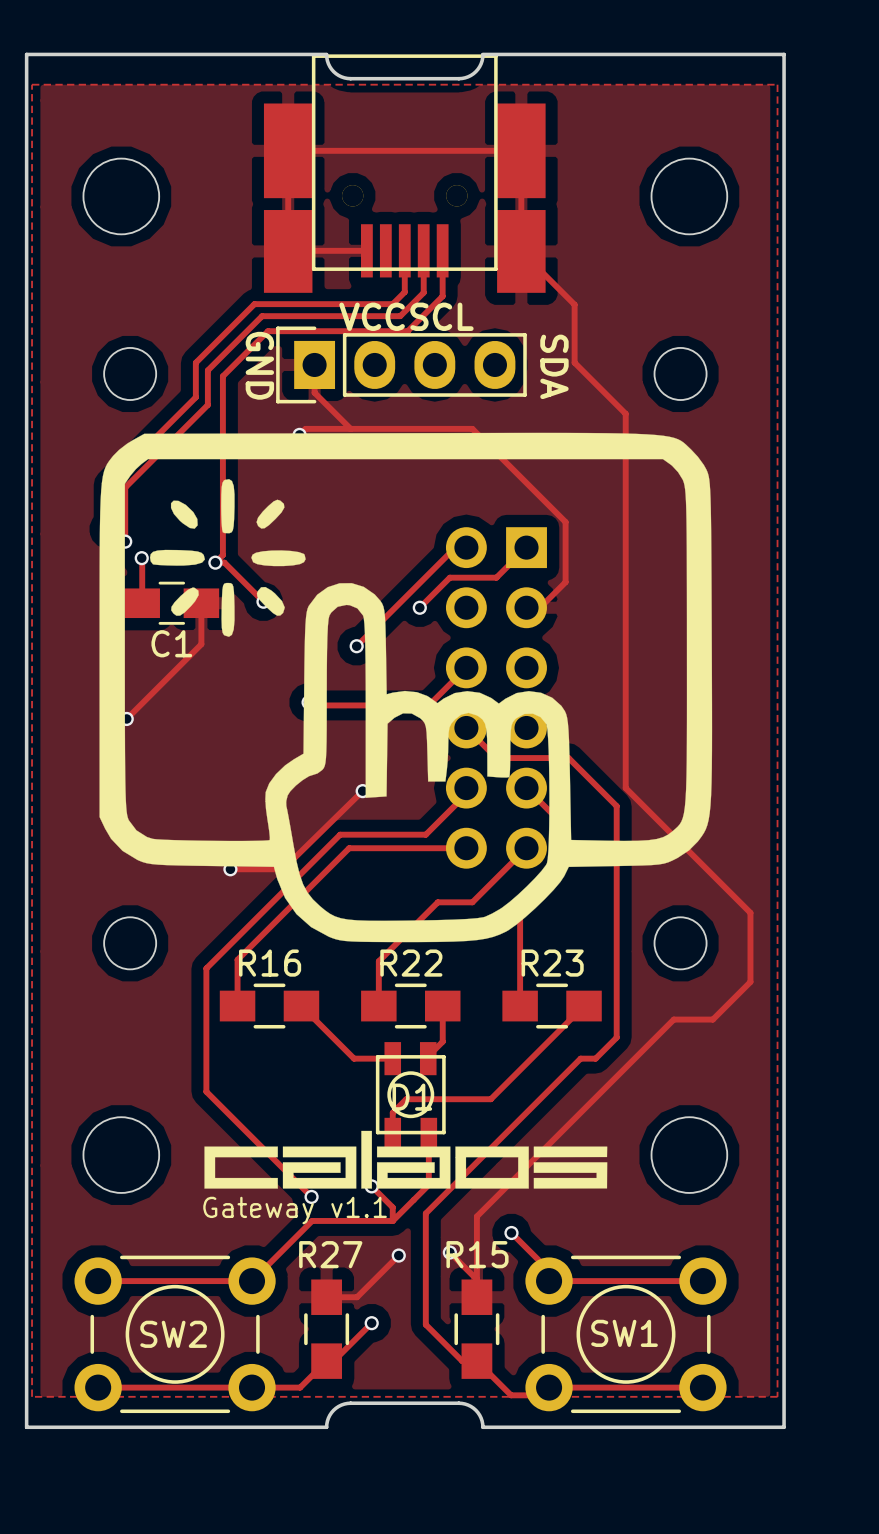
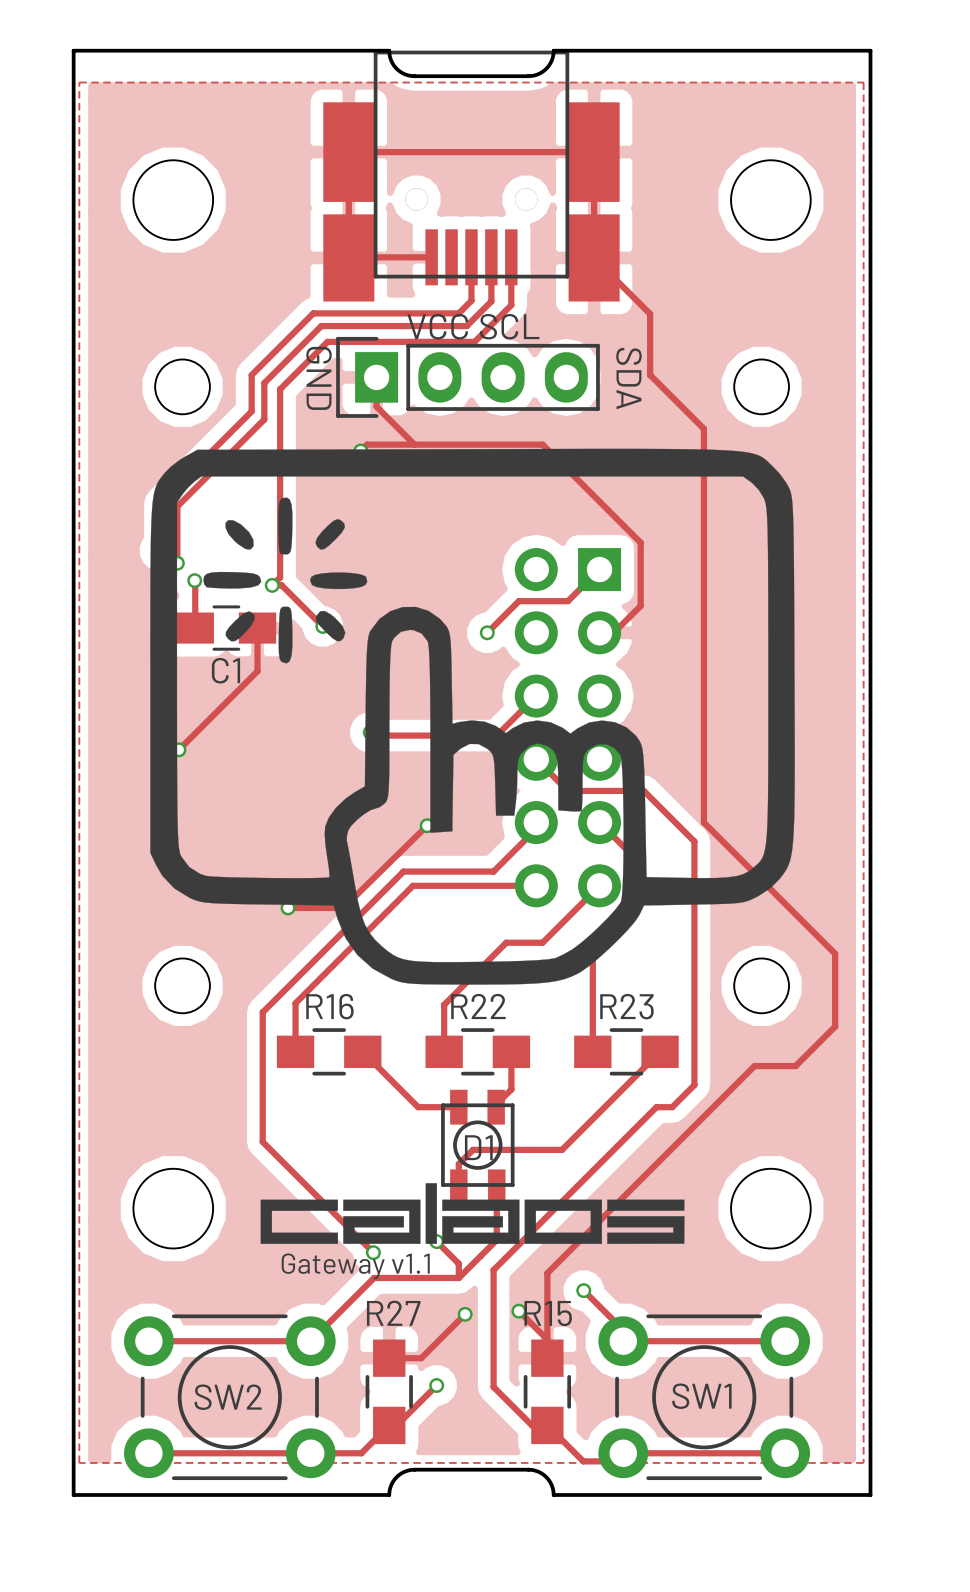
track: (466, 547) (455, 547) (356, 646) -> none
via: (356, 646) -> none

